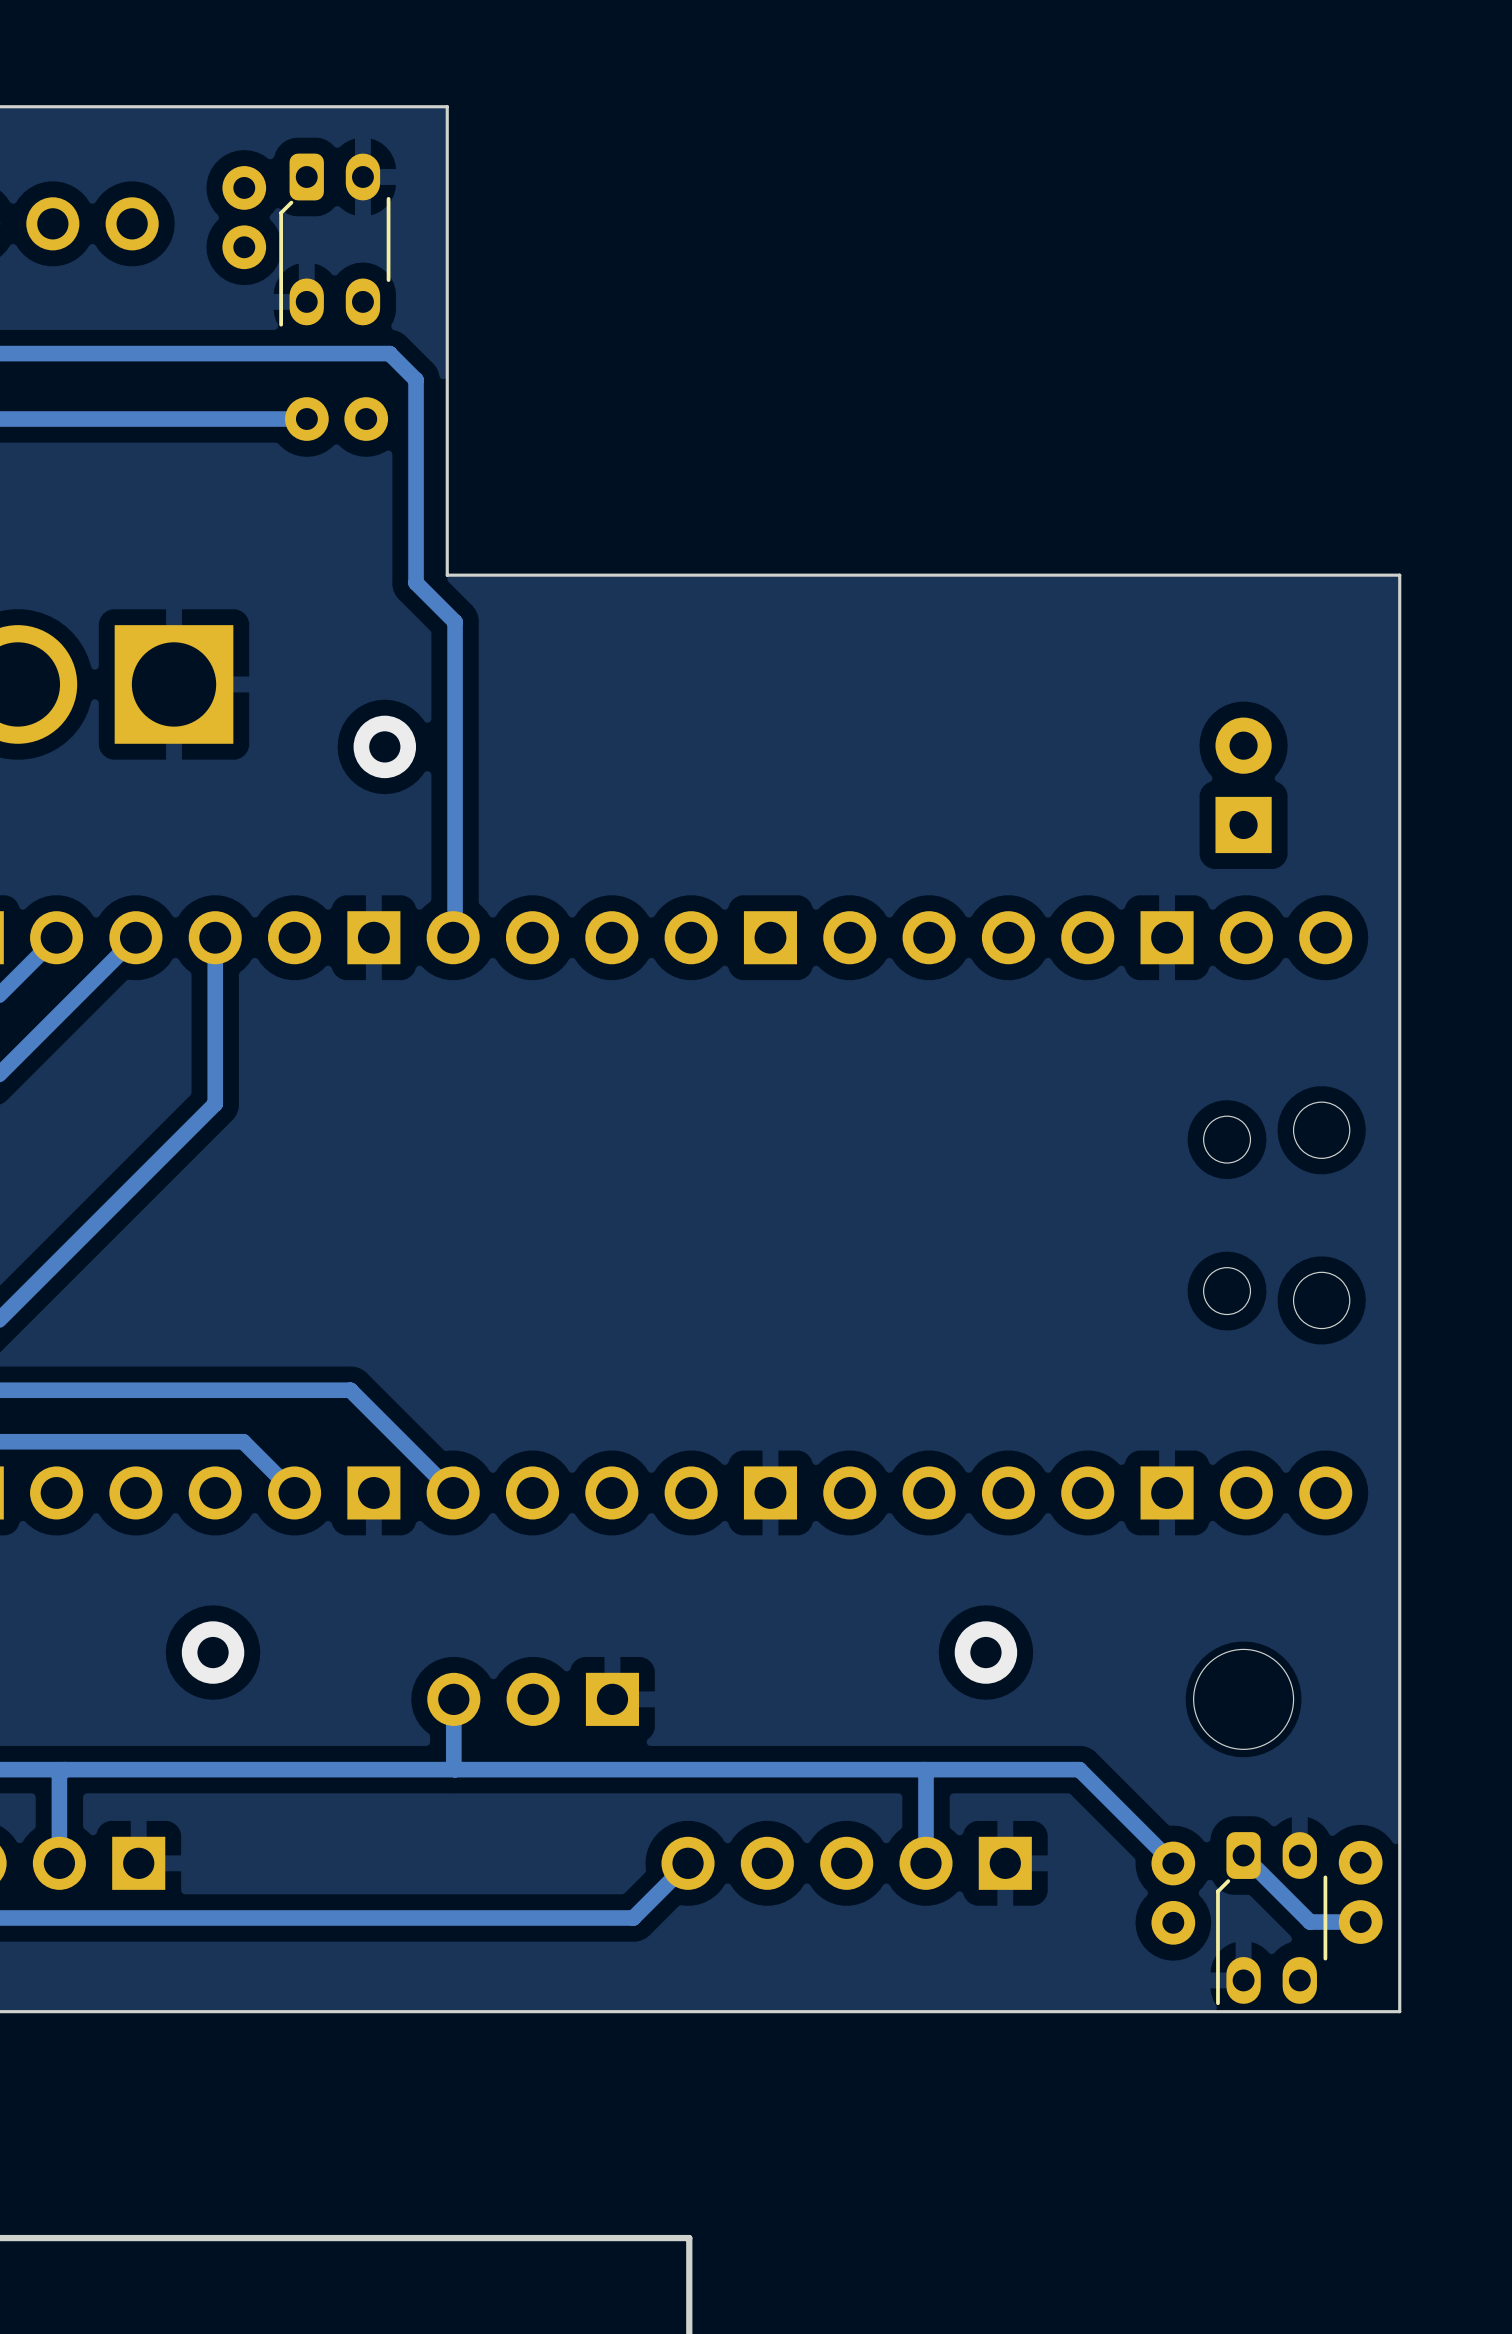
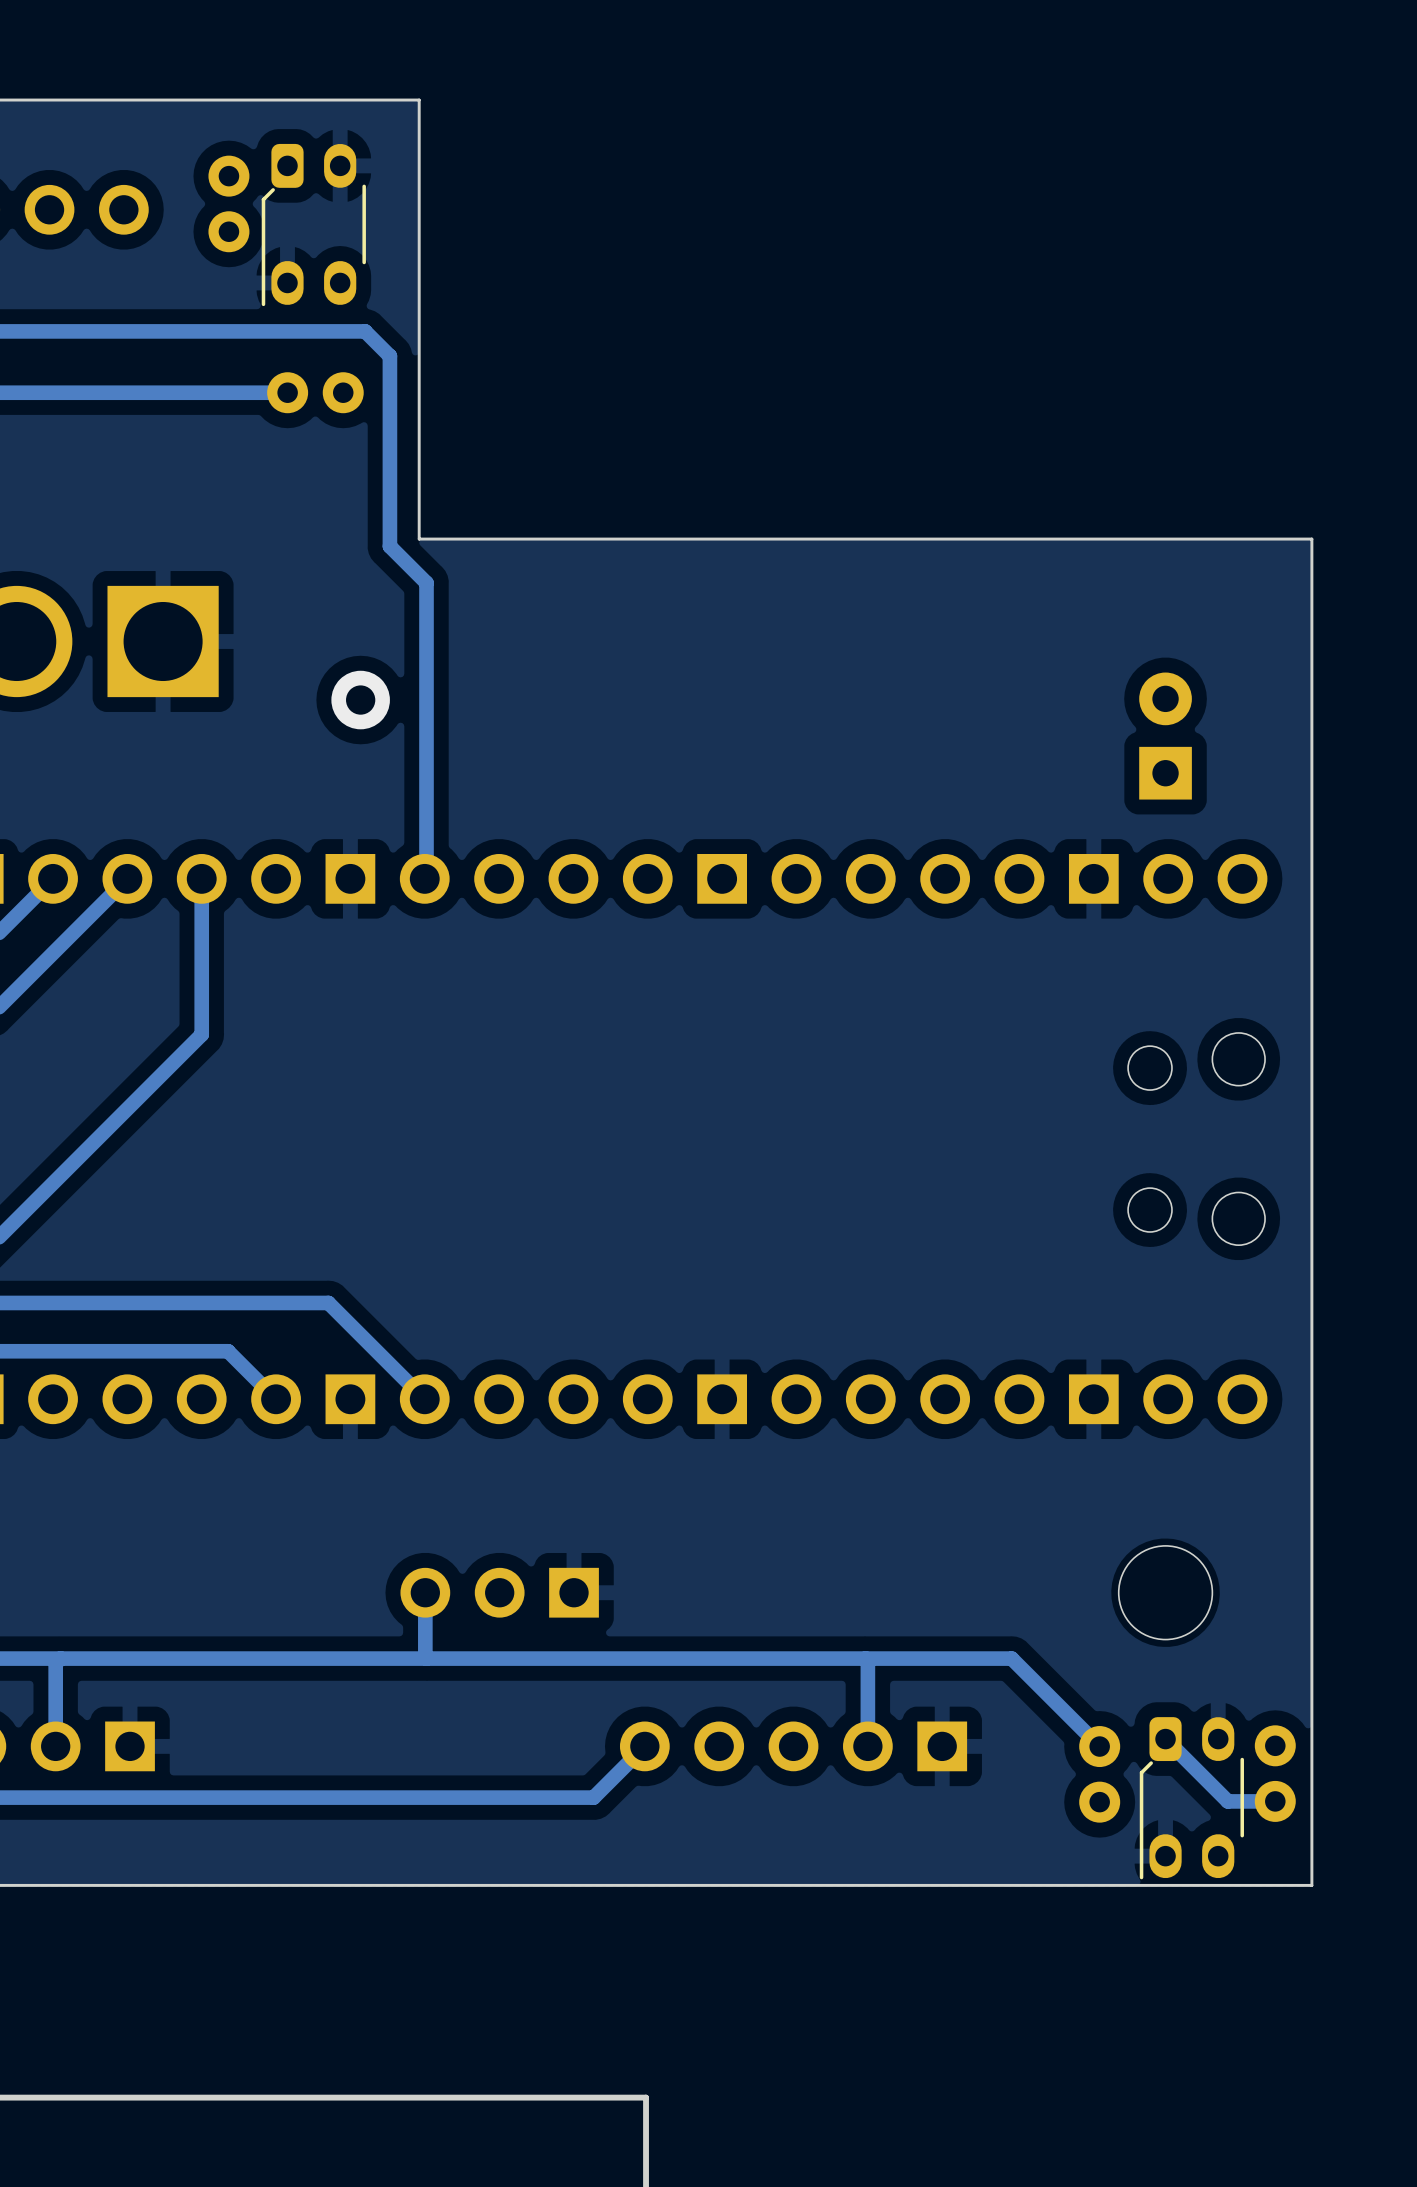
via: (213, 1652) -> none
via: (985, 1652) -> none

